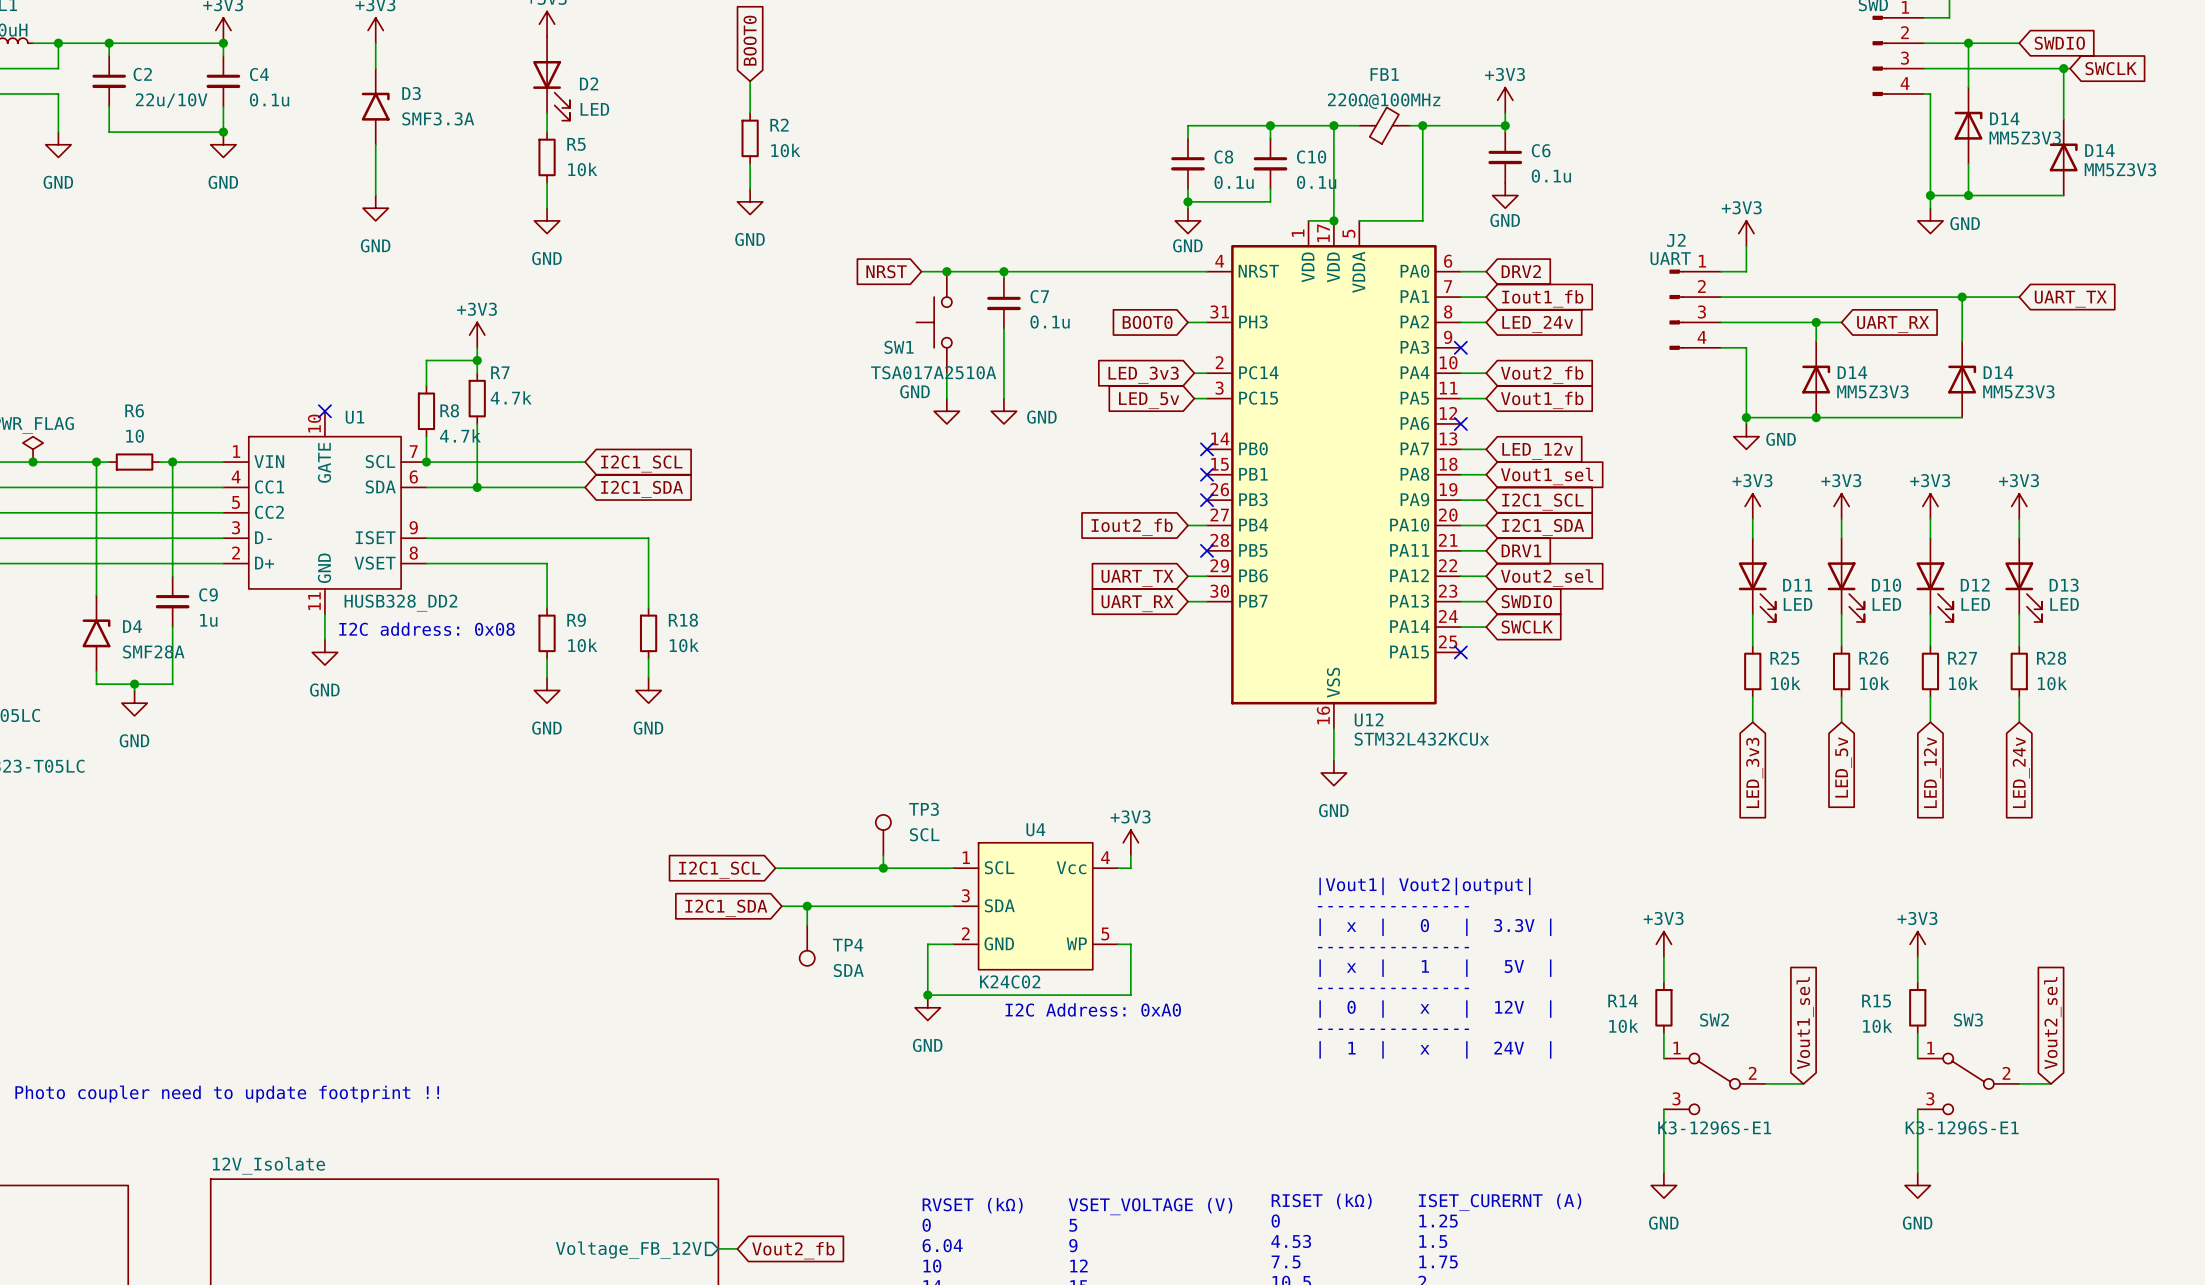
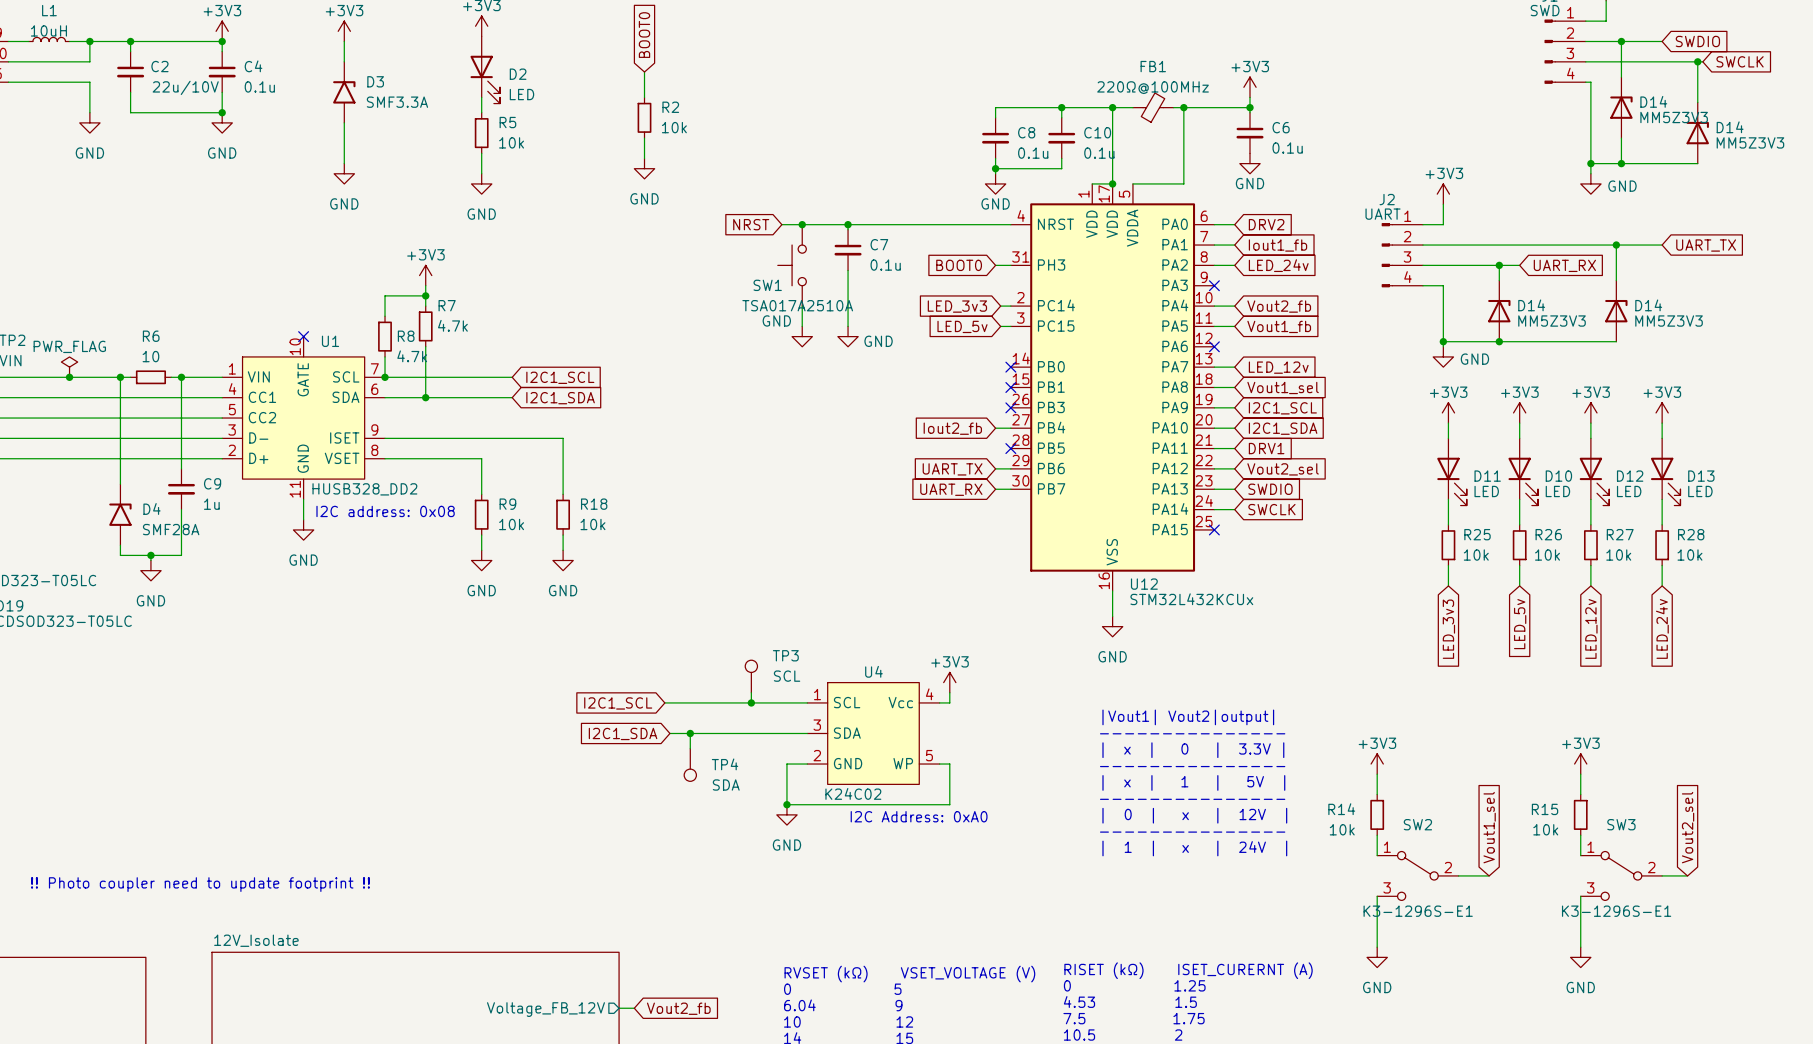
U1 symbol: [223, 411, 427, 615] -> [222, 336, 386, 500]

